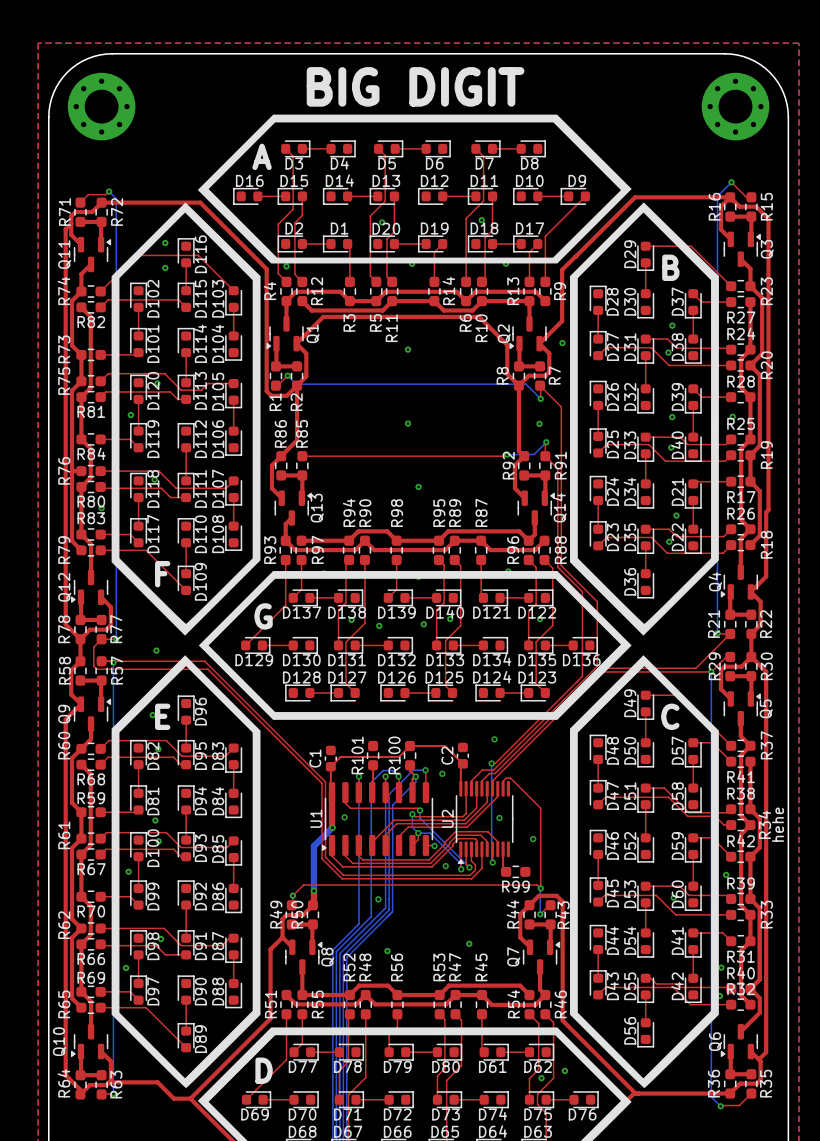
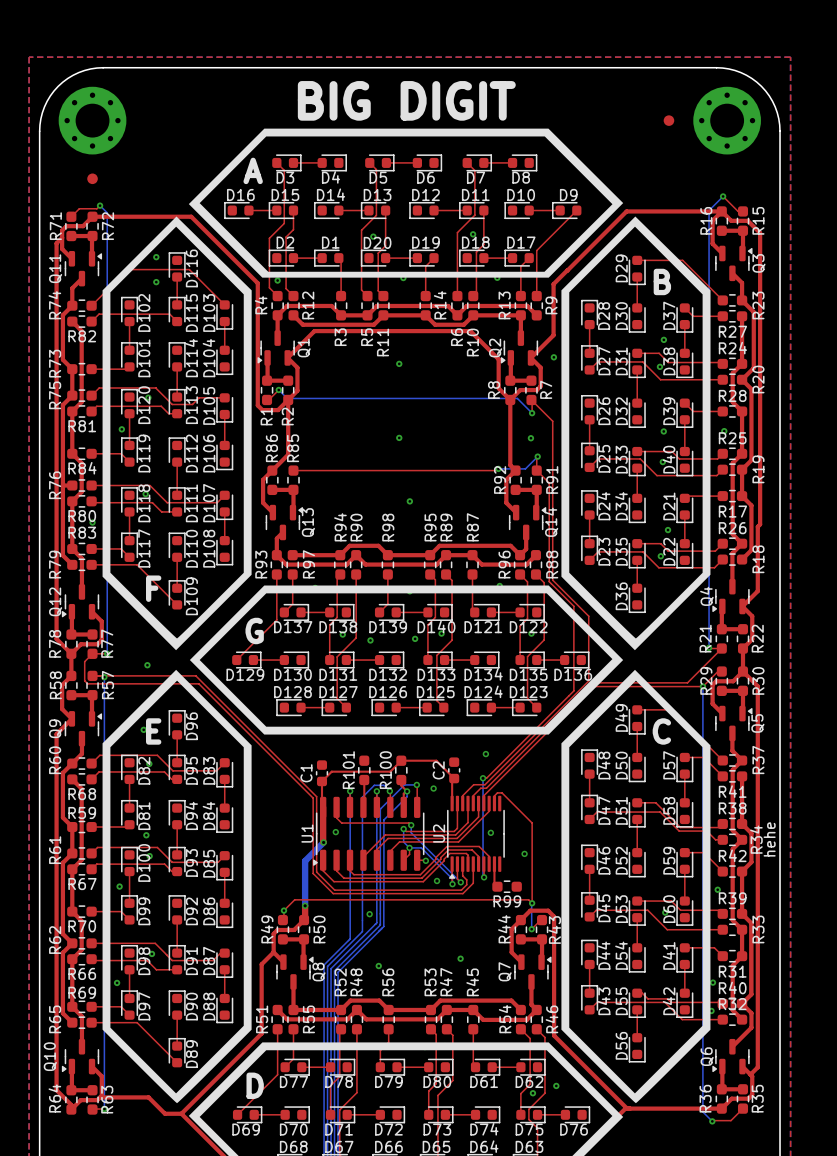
part: none -> (668, 120)
part: none -> (92, 178)
R50 name position: R50 (297, 914) -> R50 (319, 929)

